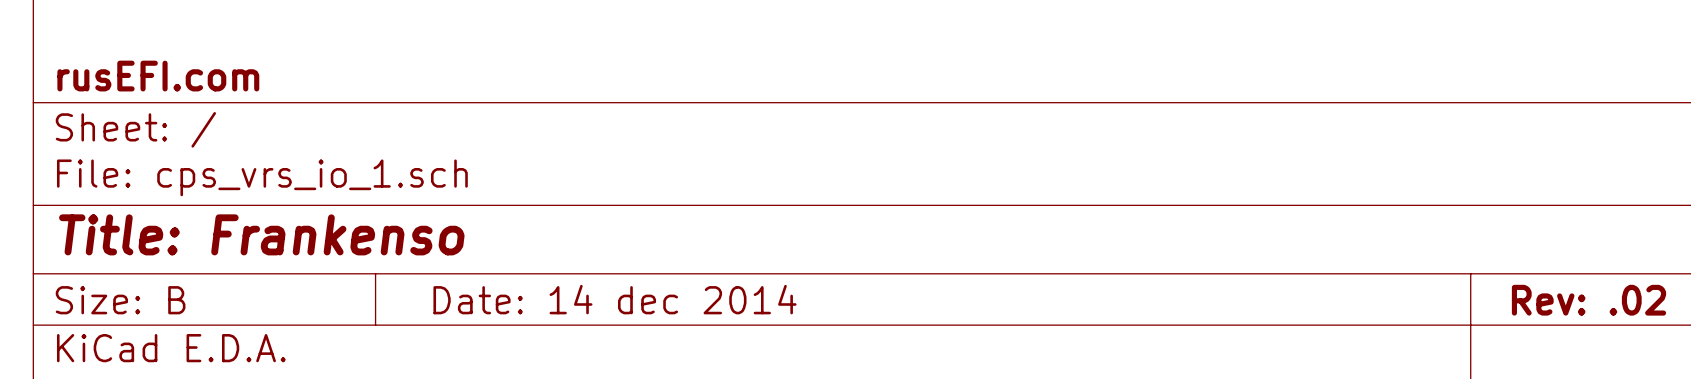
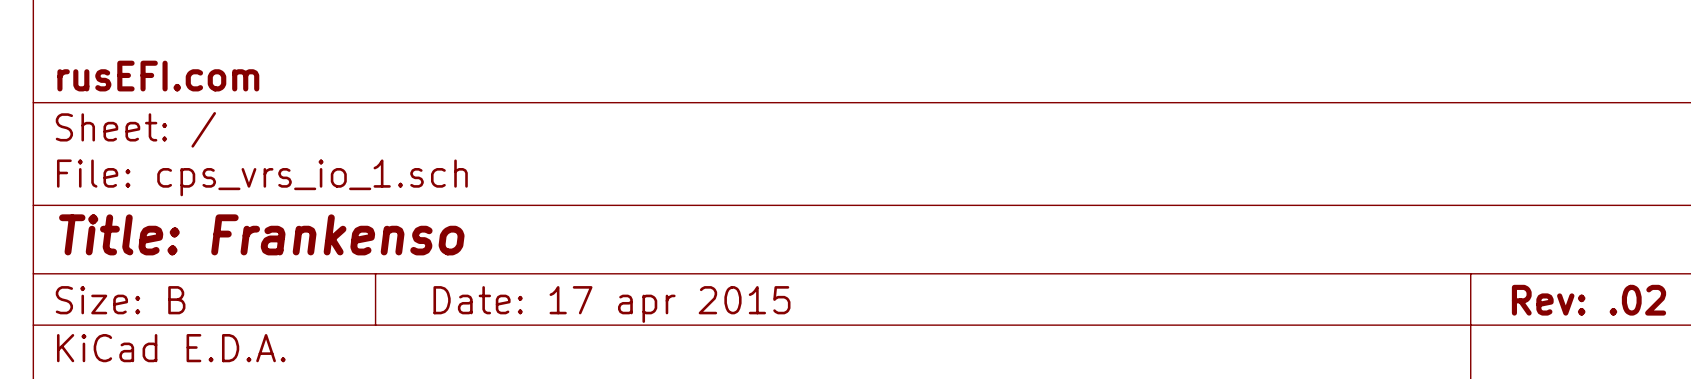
title block: Date: 14 dec 2014 (615, 299) -> Date: 17 apr 2015 (611, 304)

